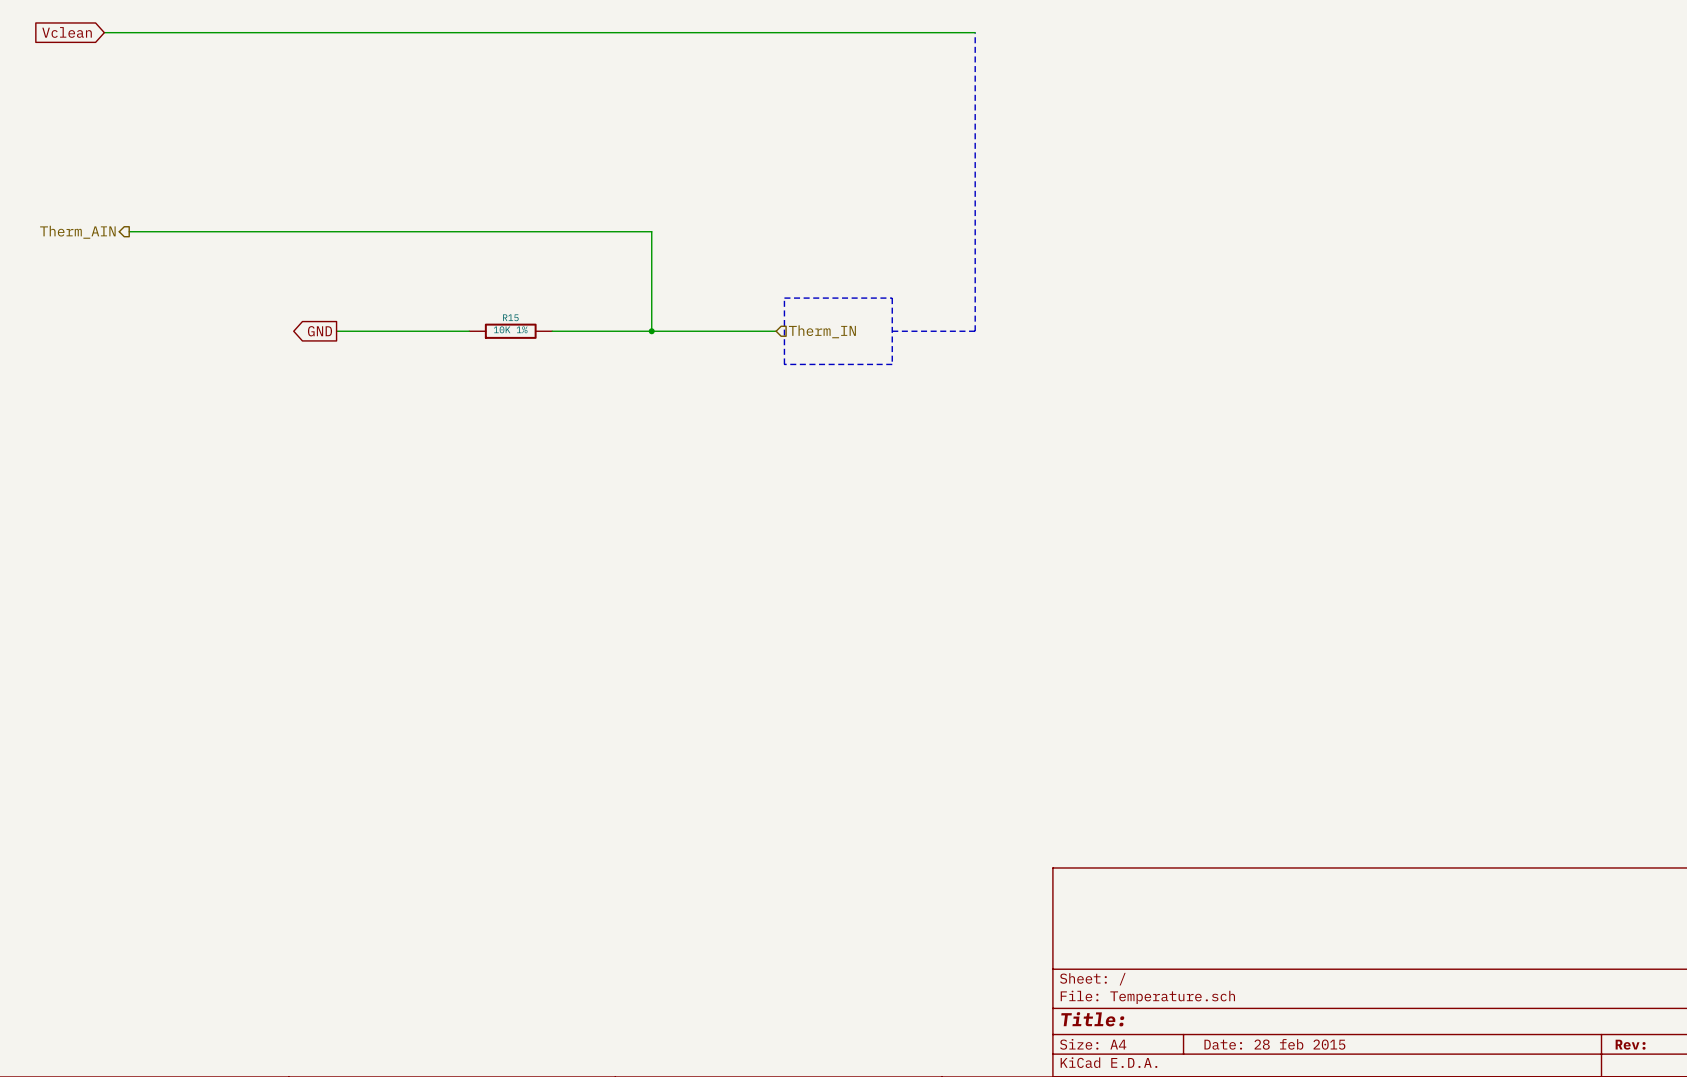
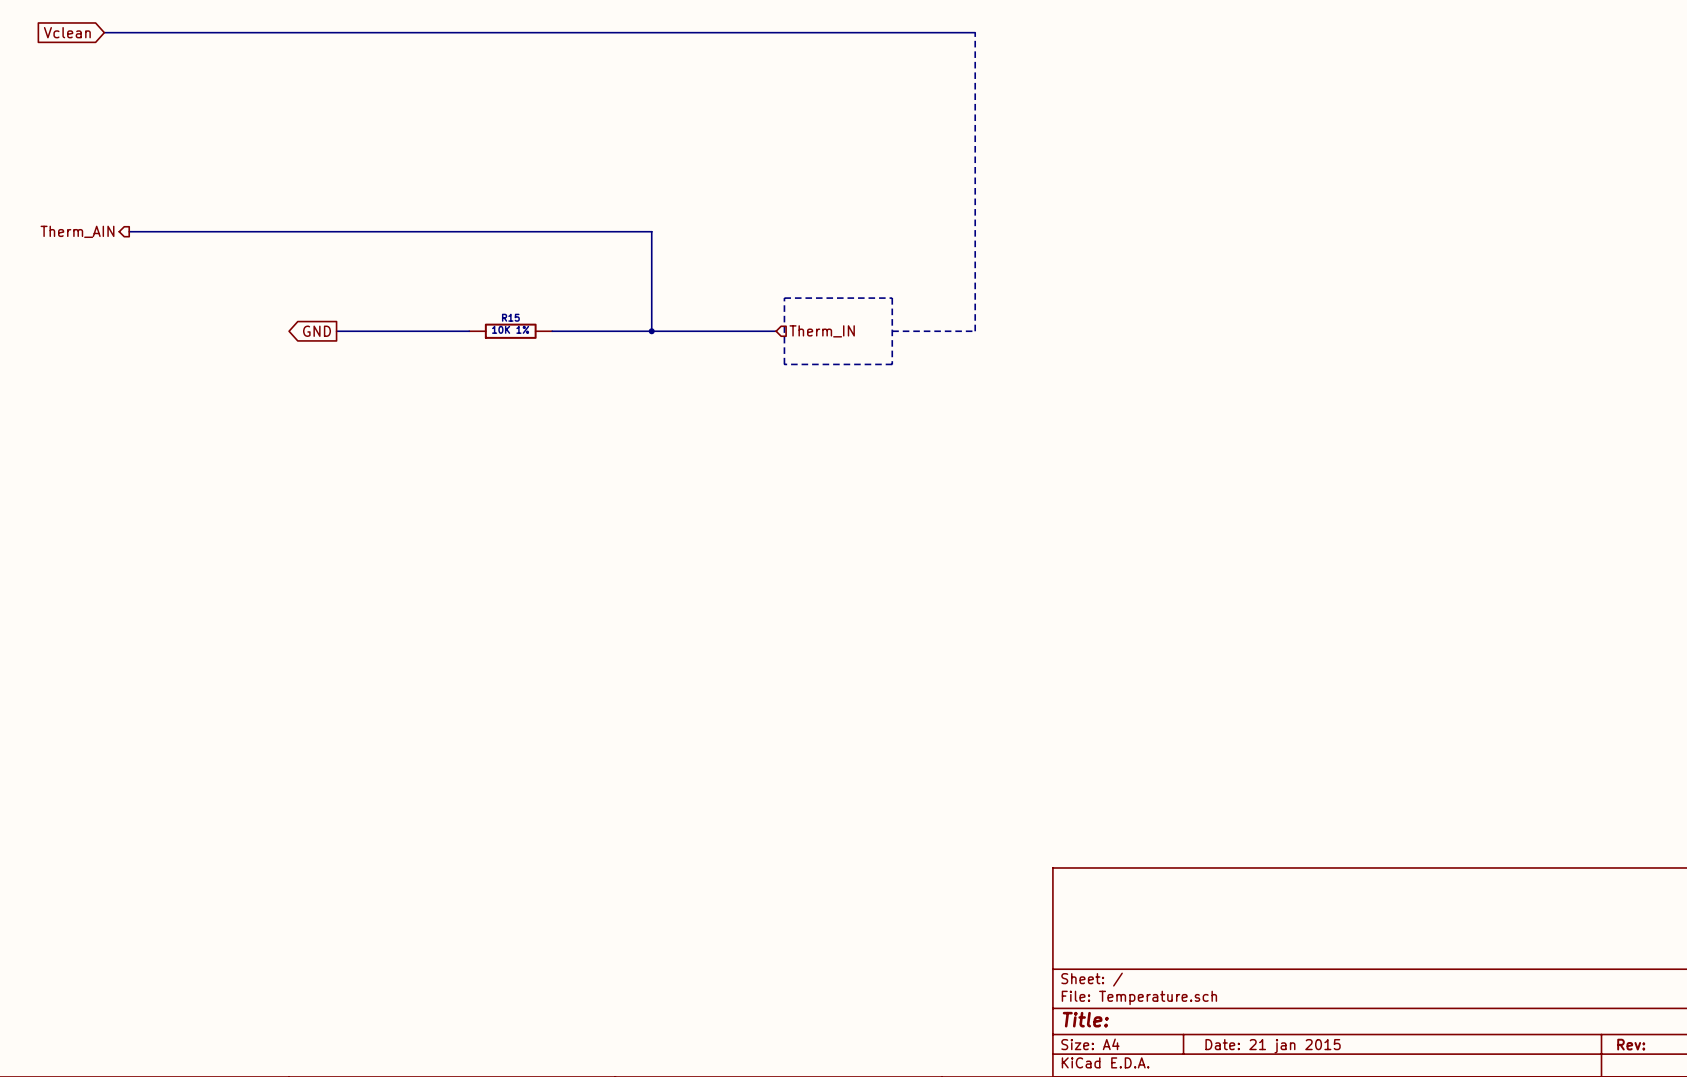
title block: Date: 28 feb 2015 (1274, 1044) -> Date: 21 jan 2015 (1273, 1046)

